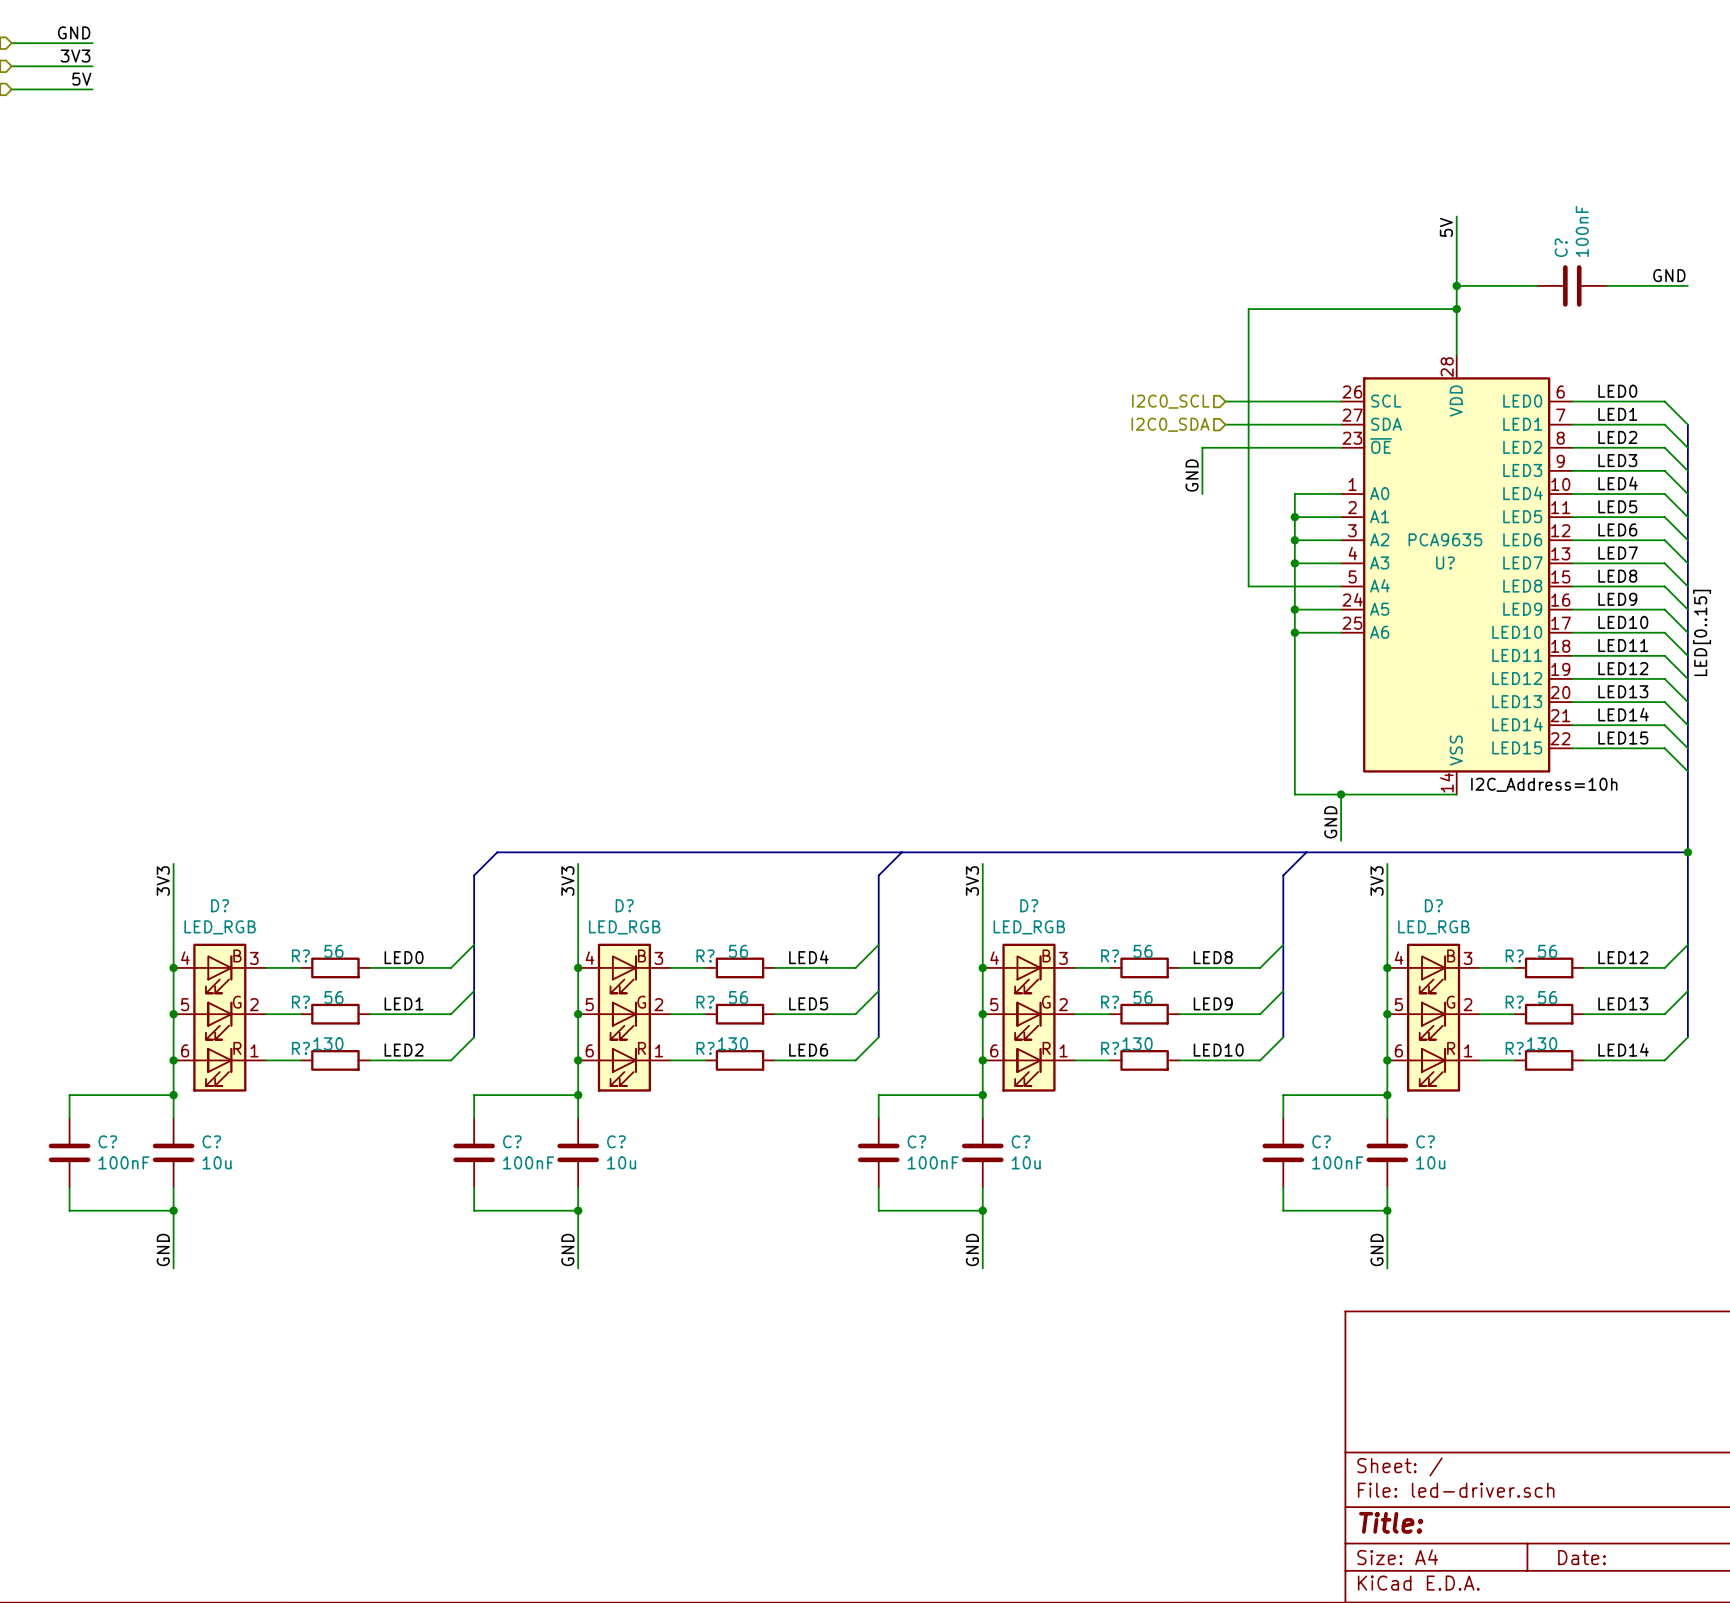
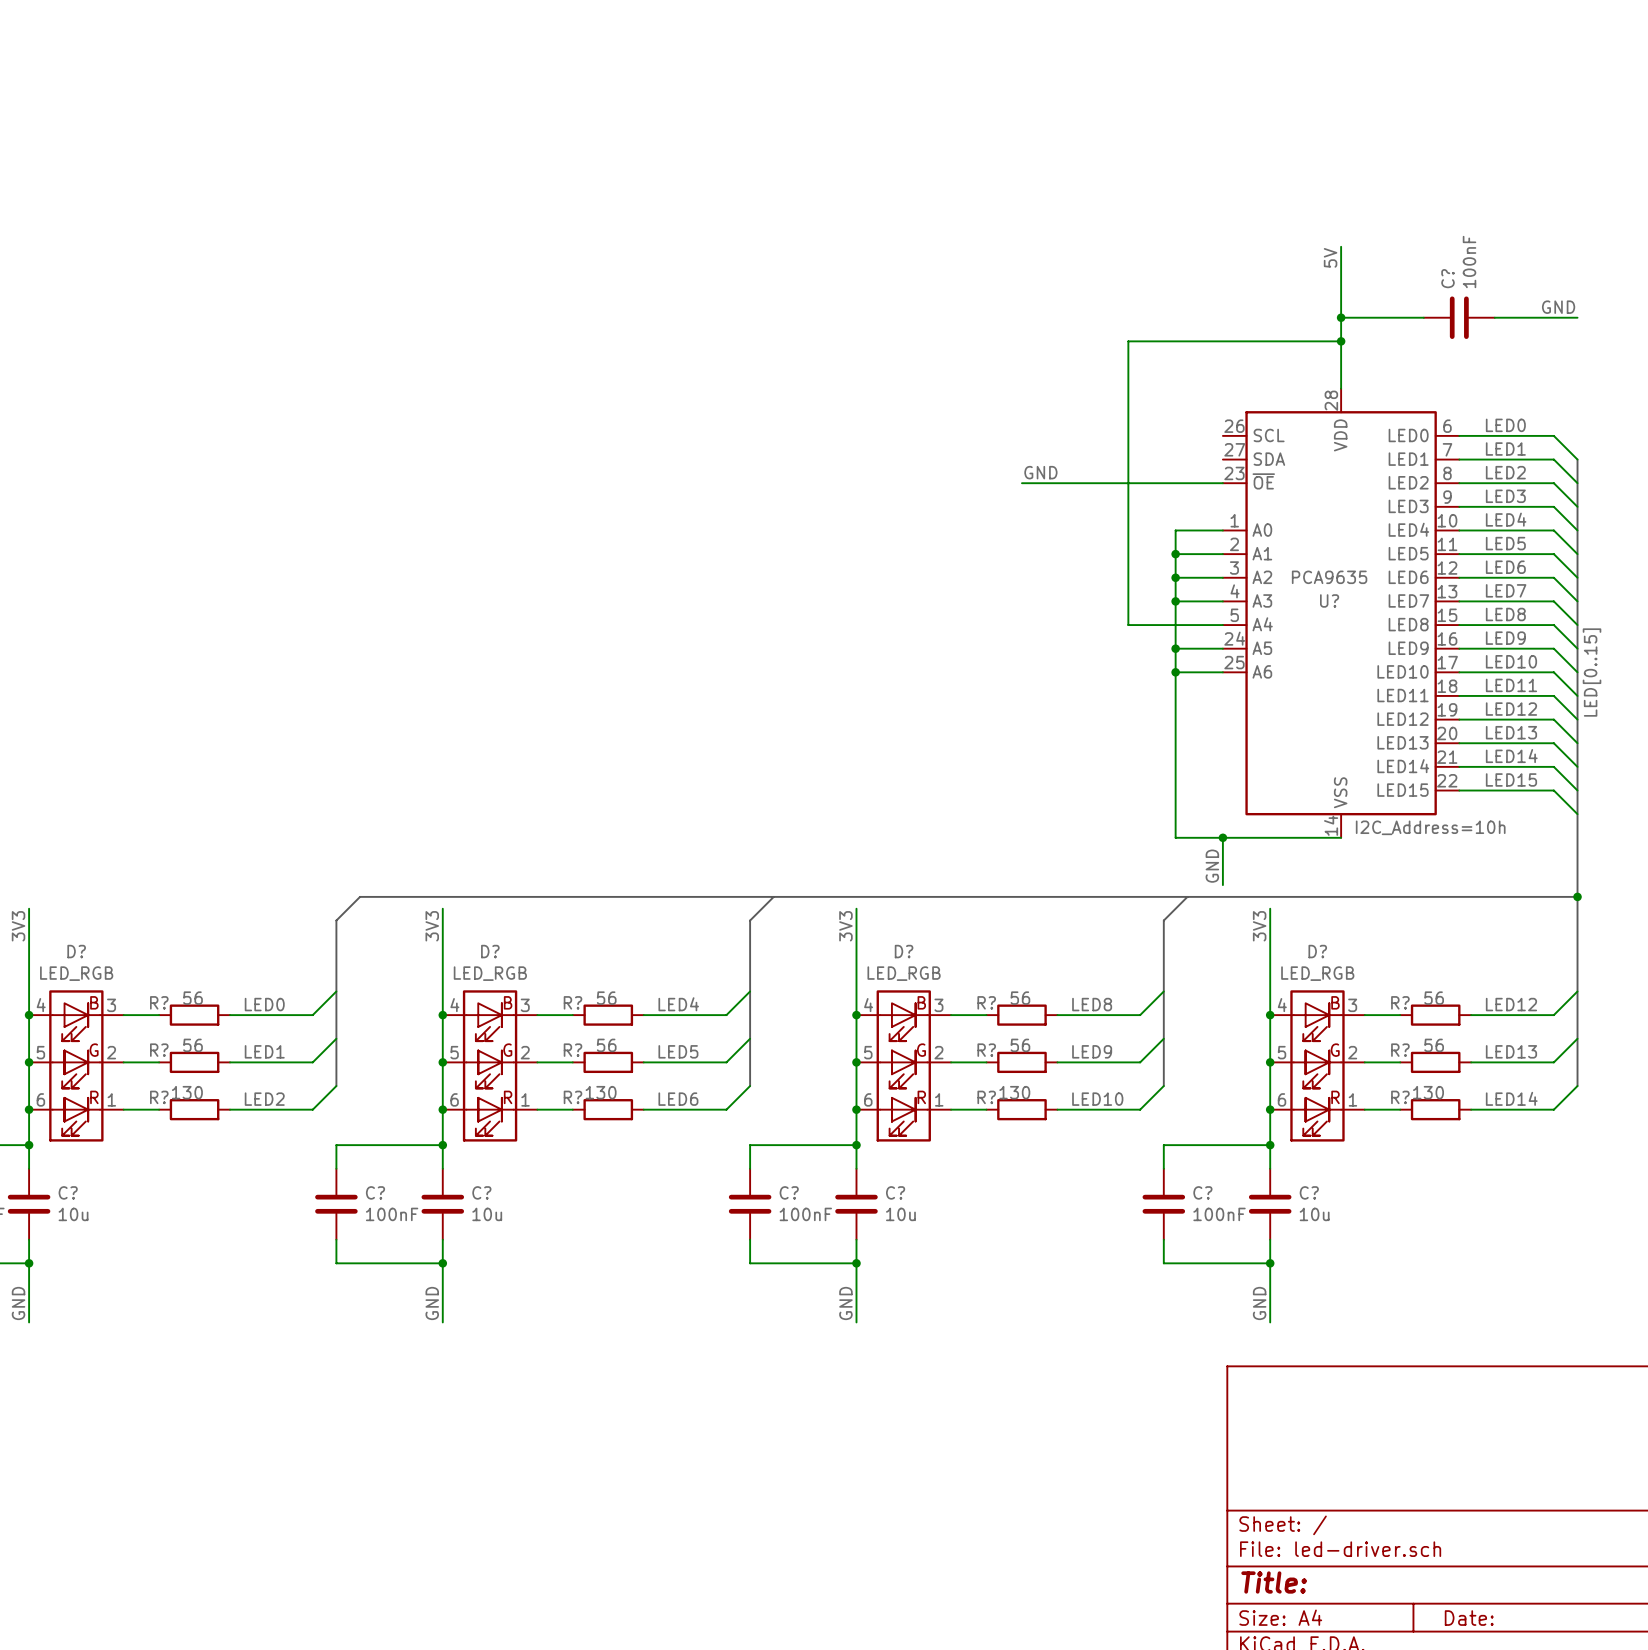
hierarchical label: I2C0_SCL (1170, 401) -> none
wire: (1225, 401) (1341, 401) -> none
hierarchical label: I2C0_SDA (1170, 424) -> none
wire: (1225, 424) (1341, 424) -> none
wire: (1202, 447) (1202, 494) -> (1081, 483) (1021, 483)
label rotation: 0° (1192, 475) -> 90° clockwise (1040, 472)

